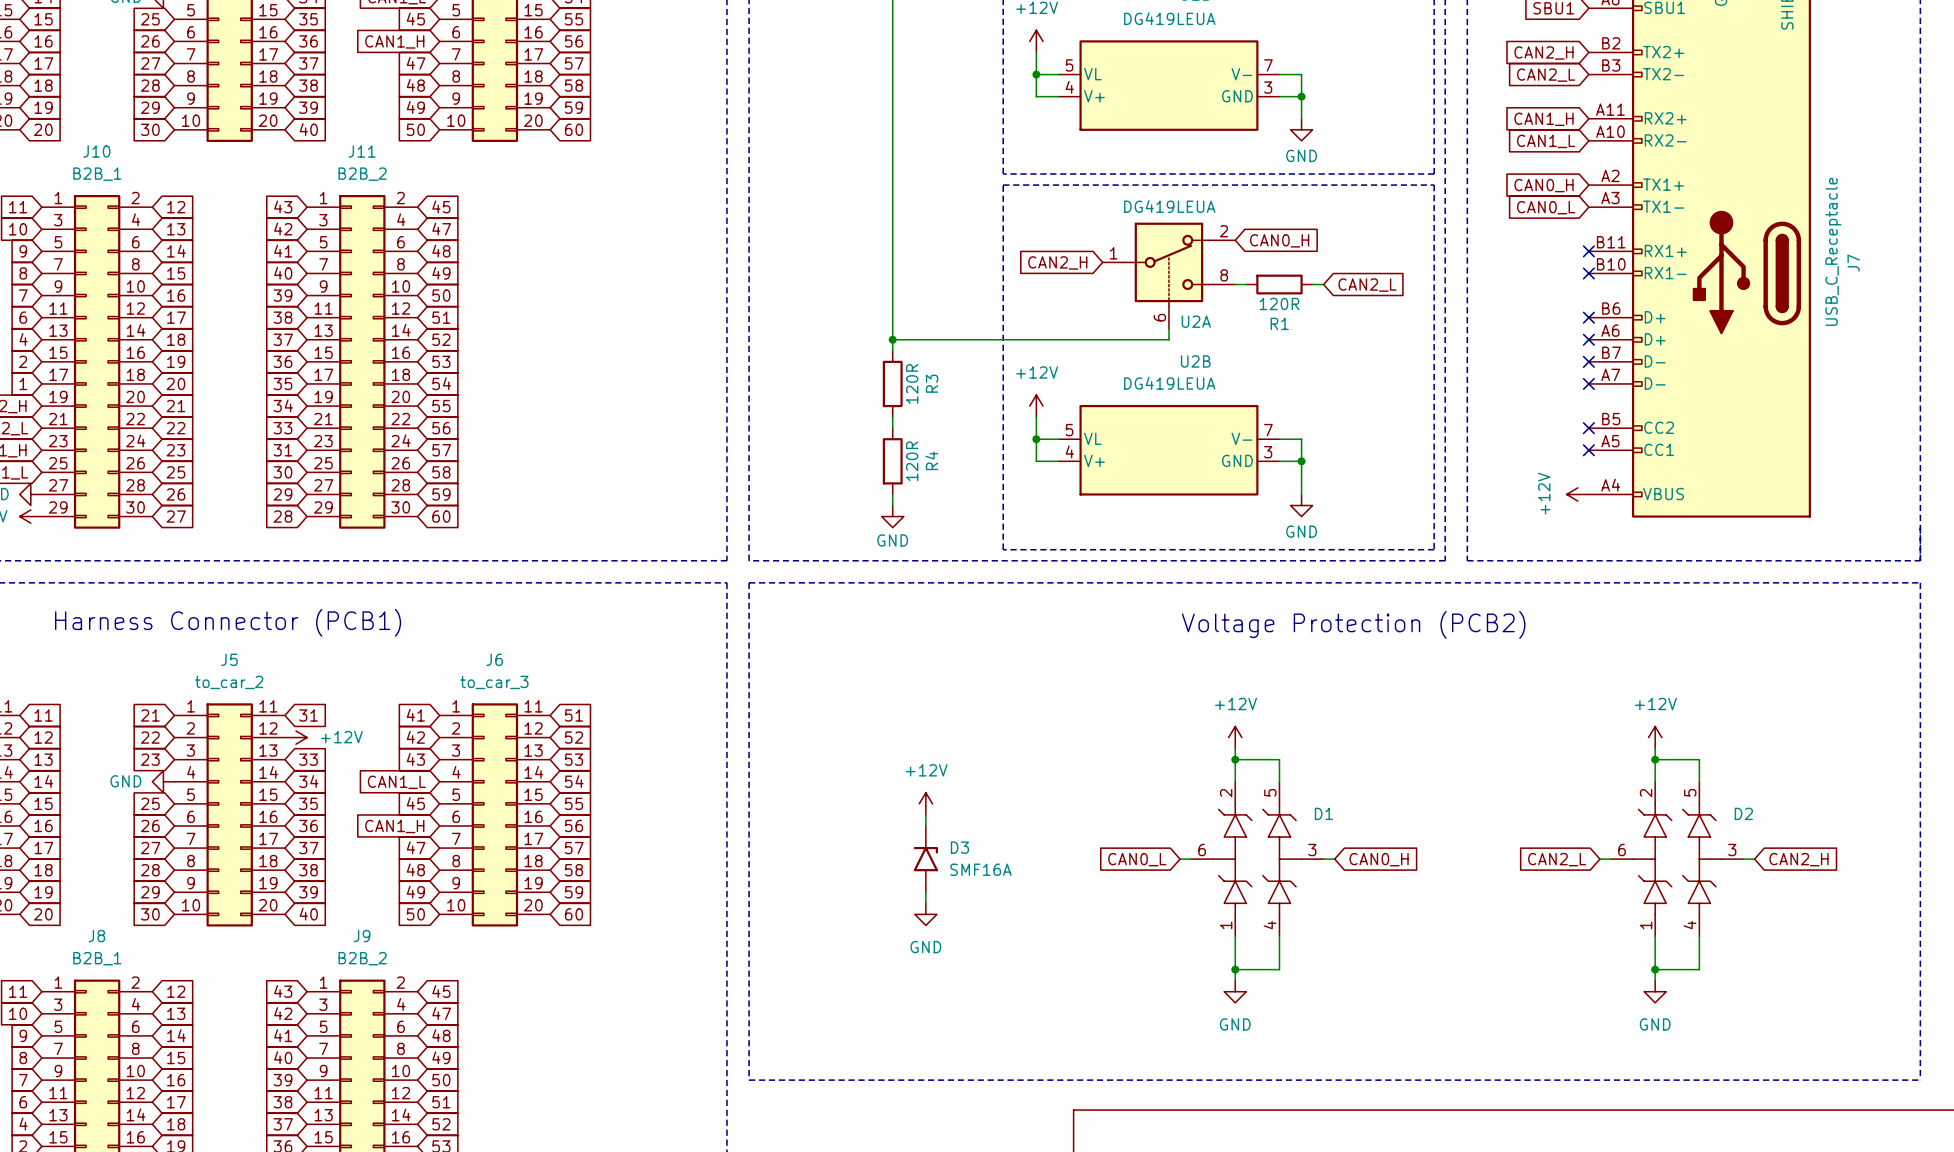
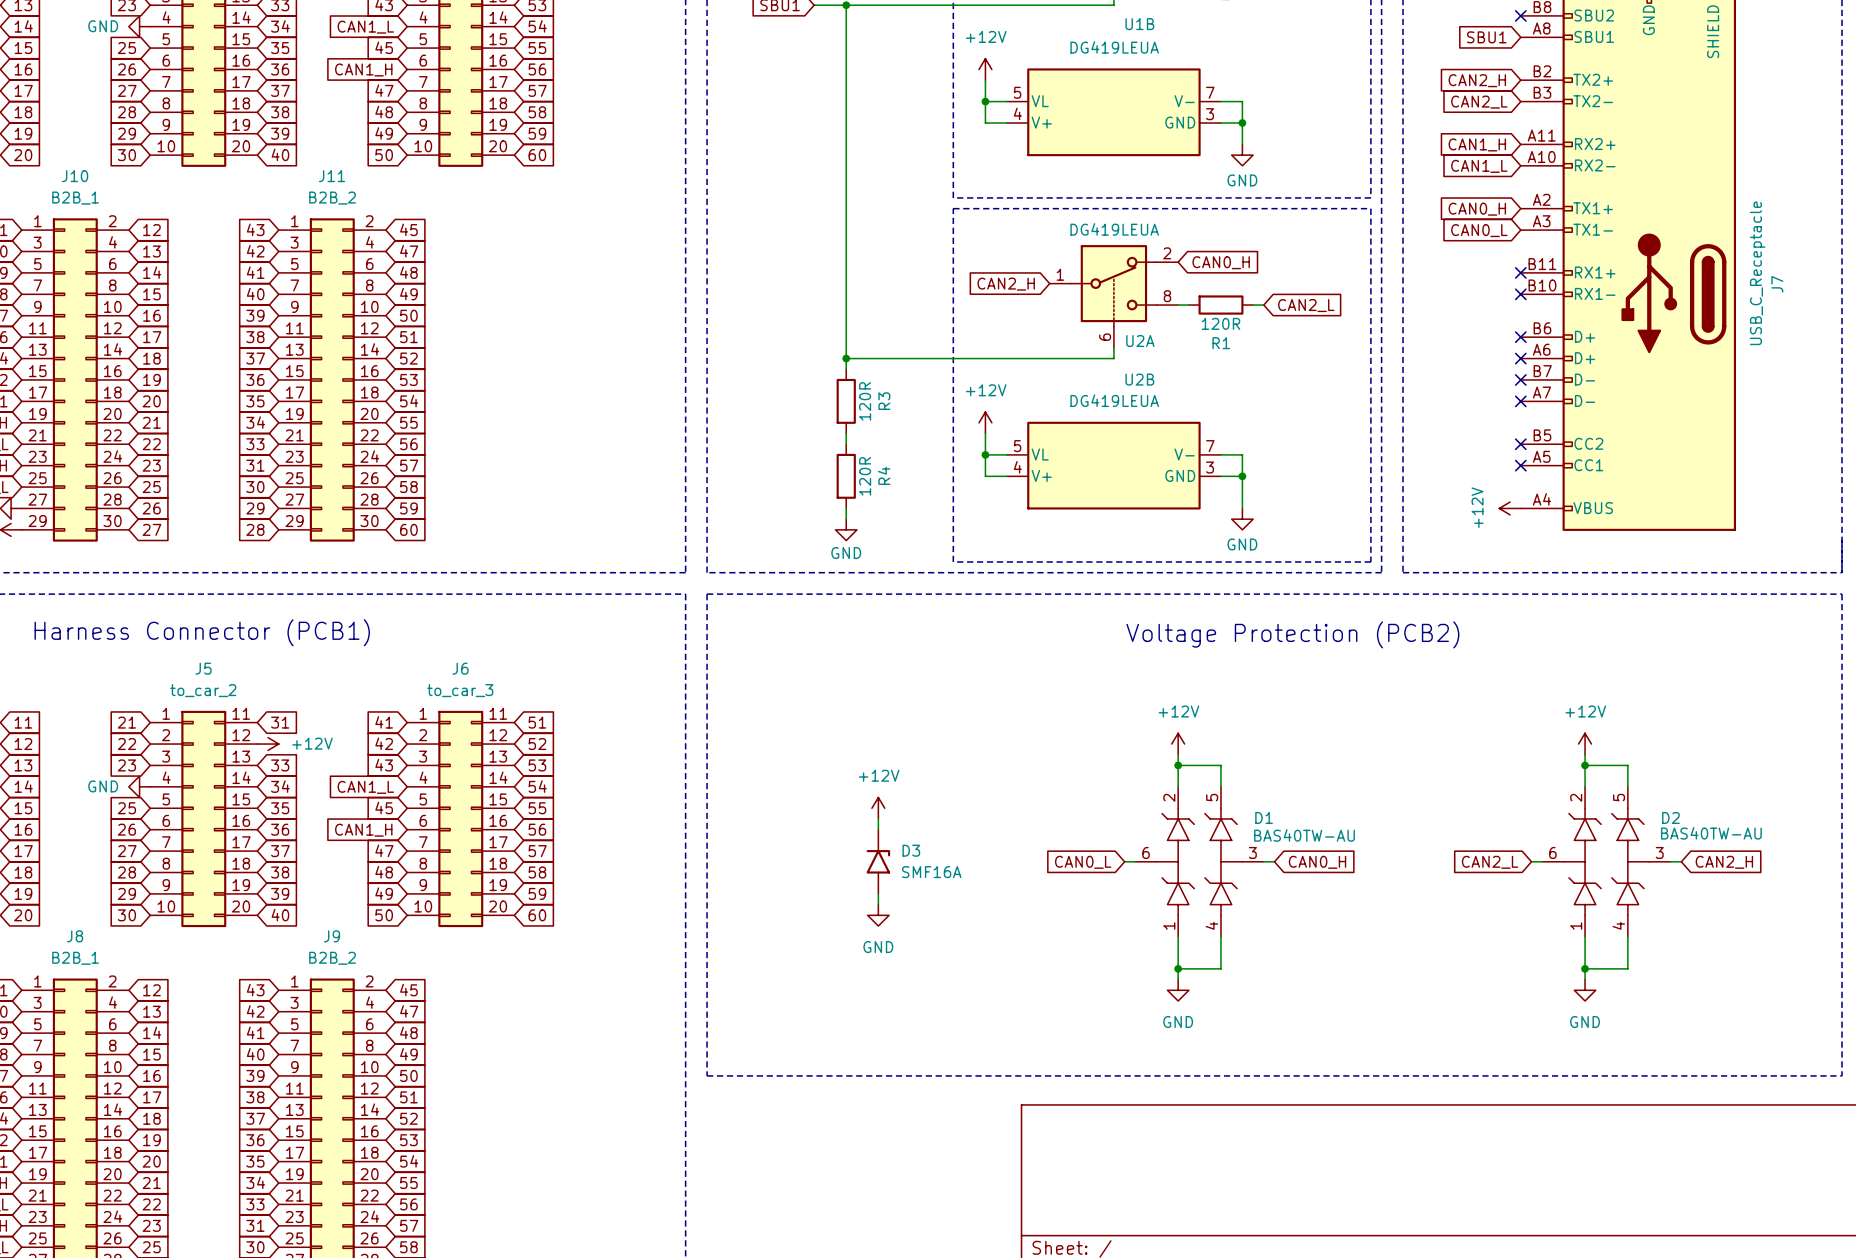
D2 value: none -> BAS40TW-AU (1711, 833)
D1 value: none -> BAS40TW-AU (1304, 835)

